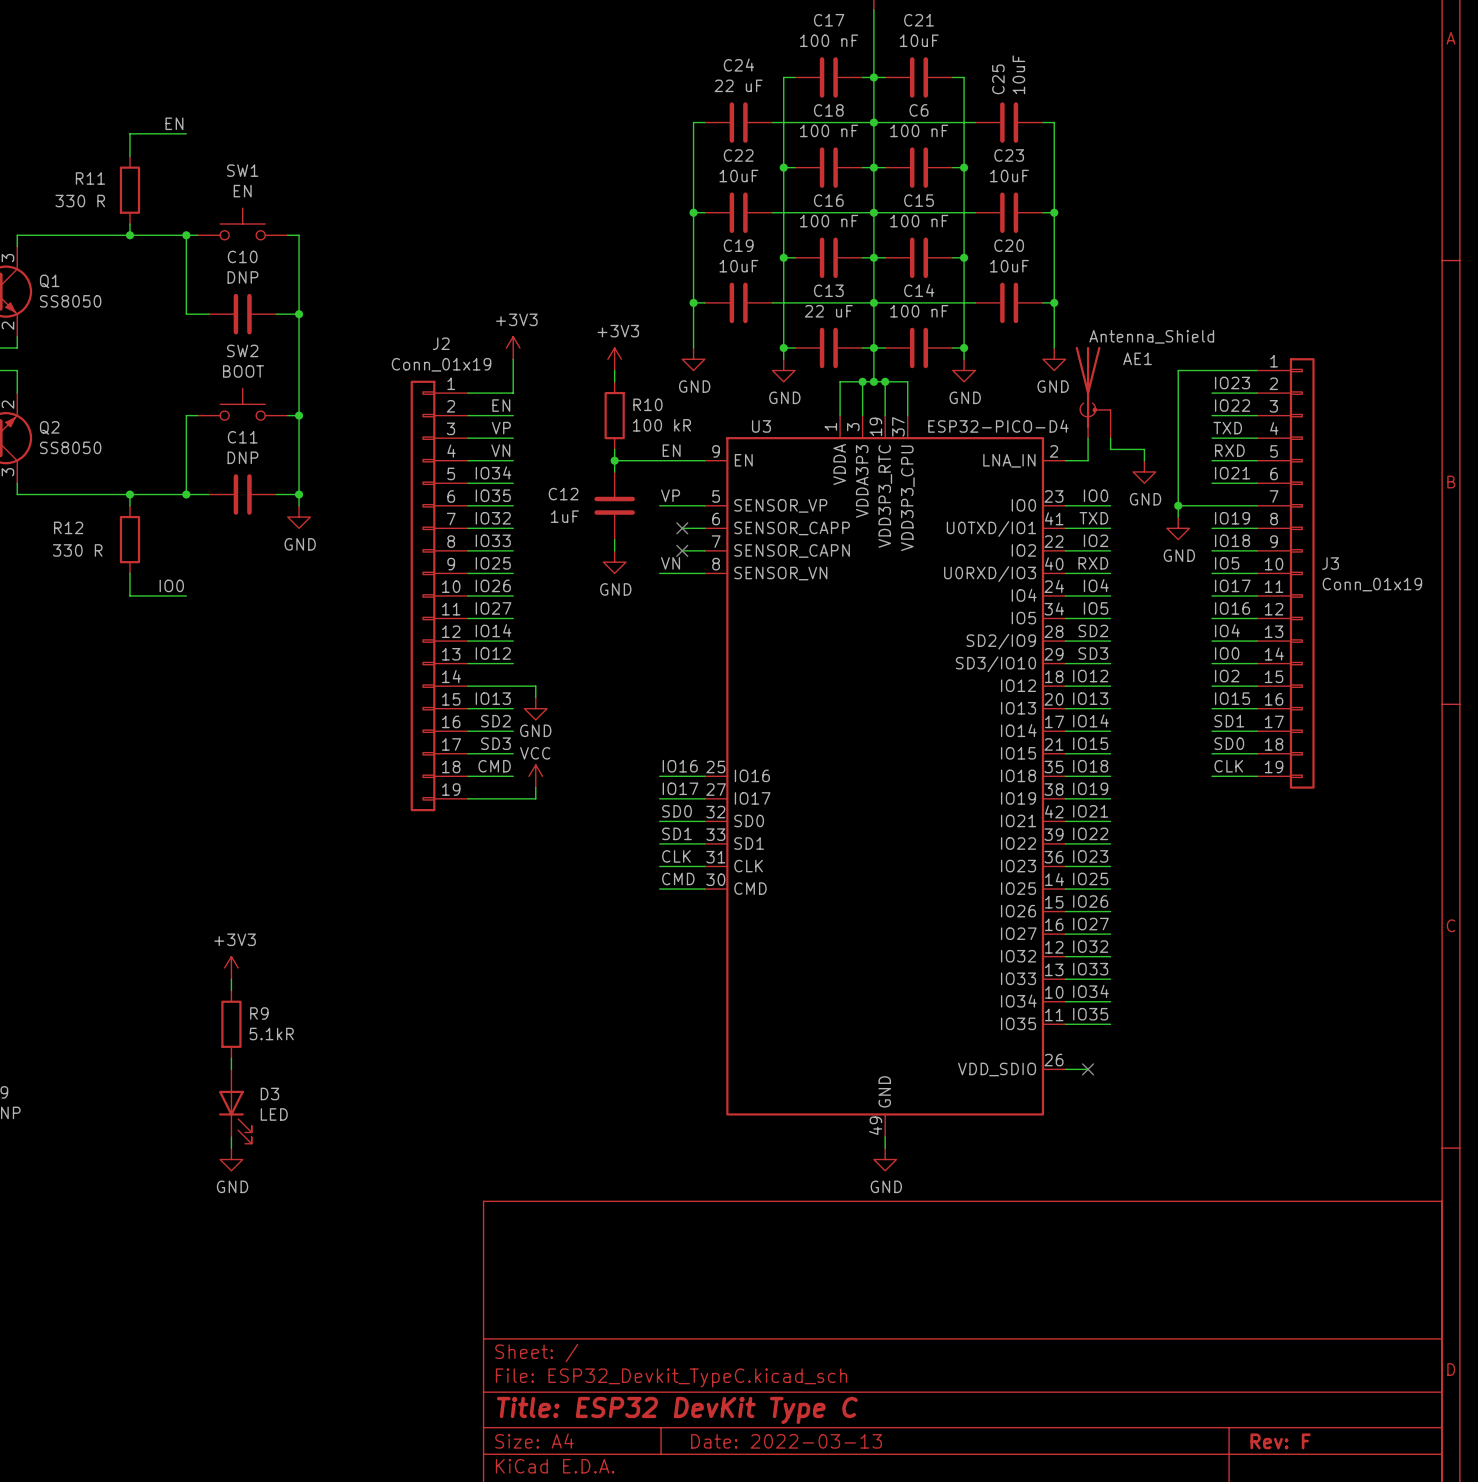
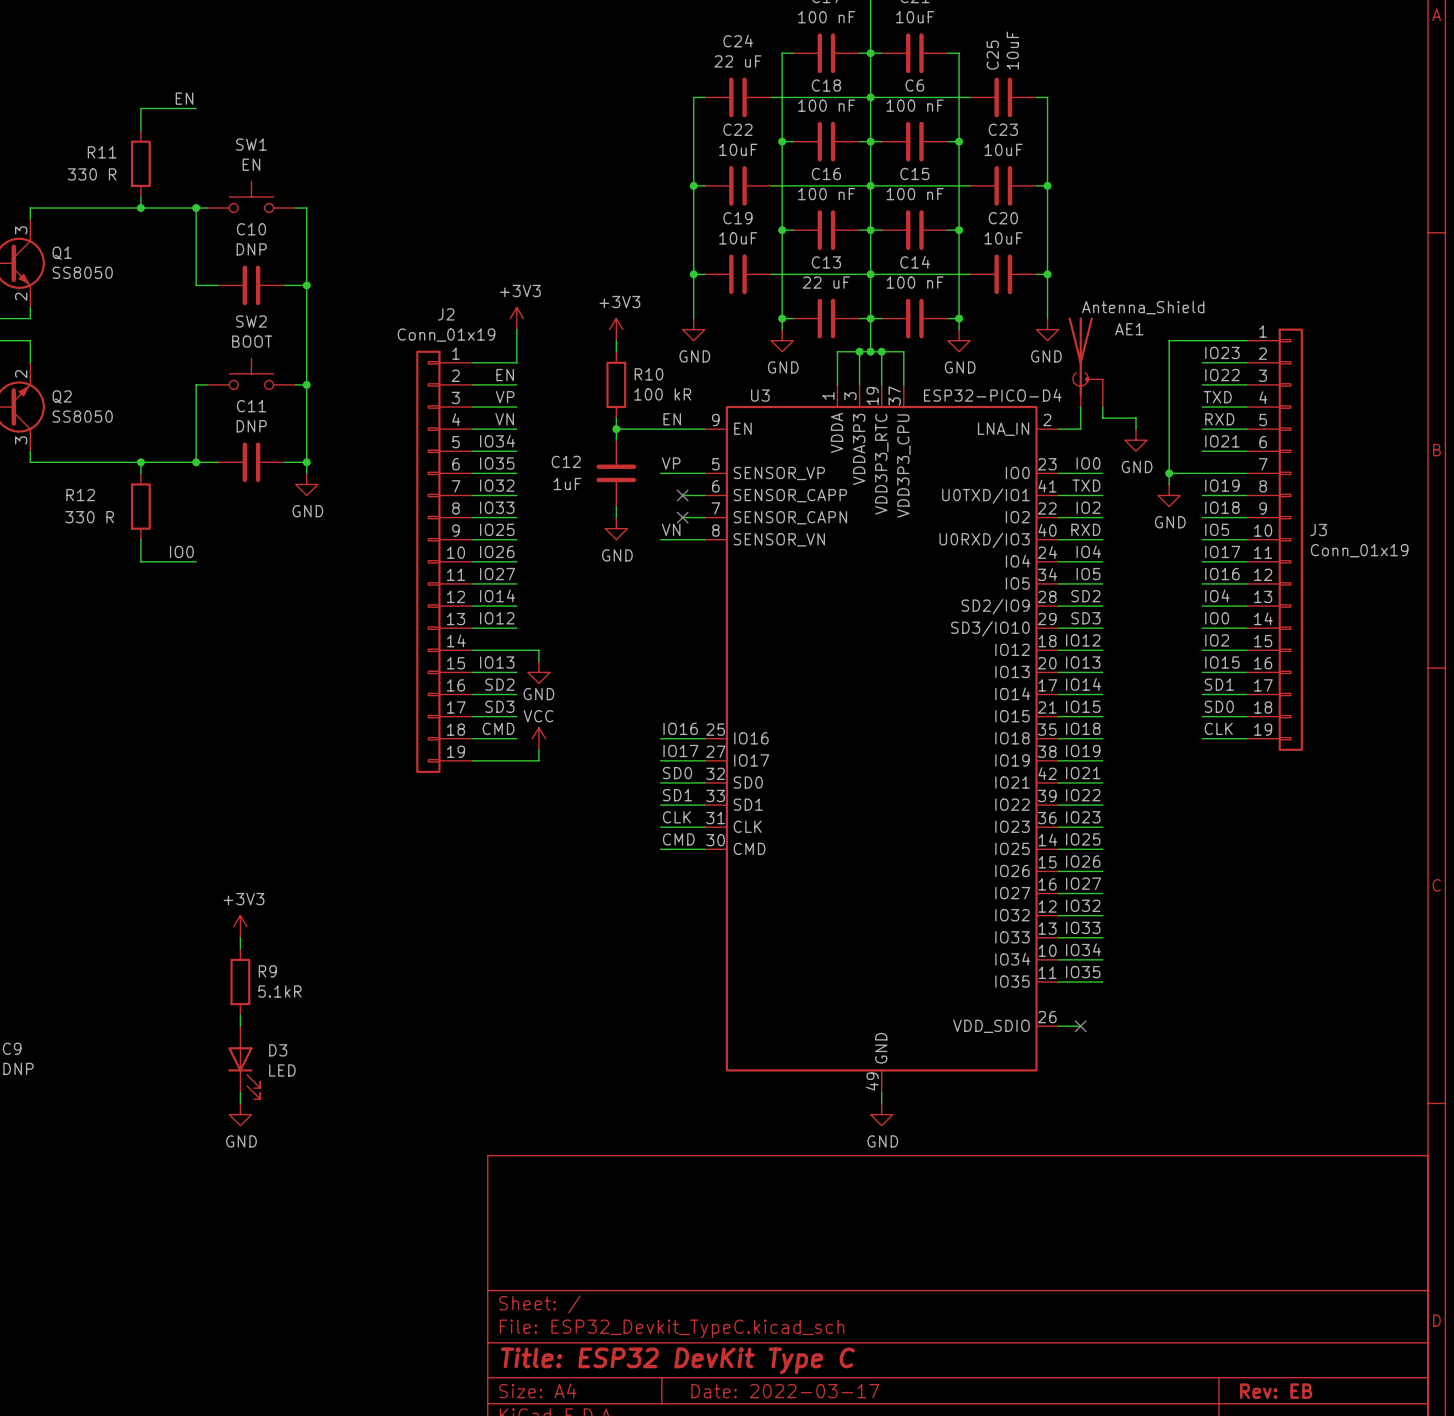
title block: Date: 2022-03-13 (786, 1441) -> Date: 2022-03-17 (785, 1391)
title block: Rev: F (1280, 1441) -> Rev: EB (1276, 1391)

